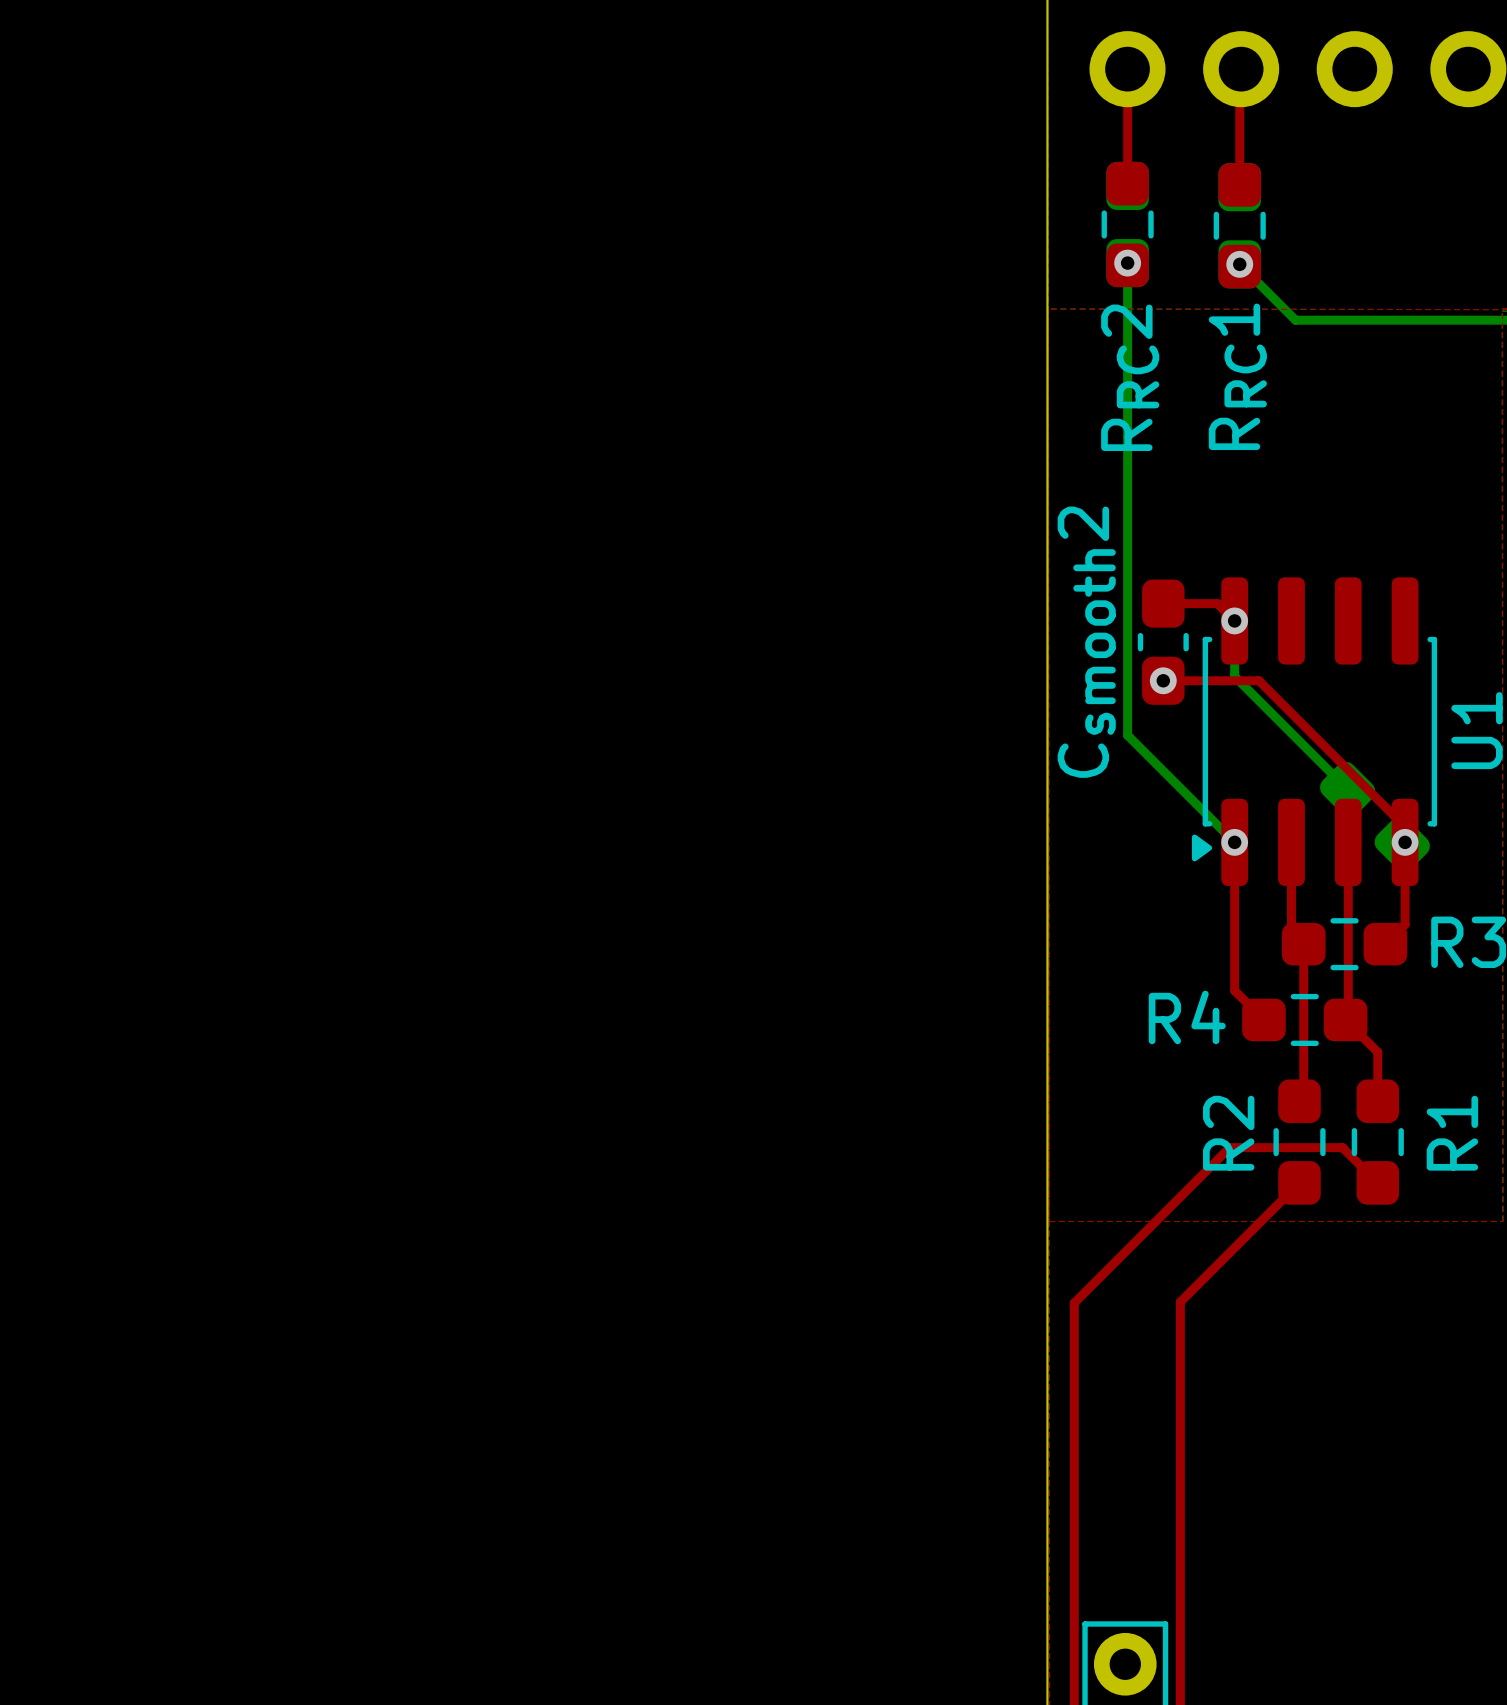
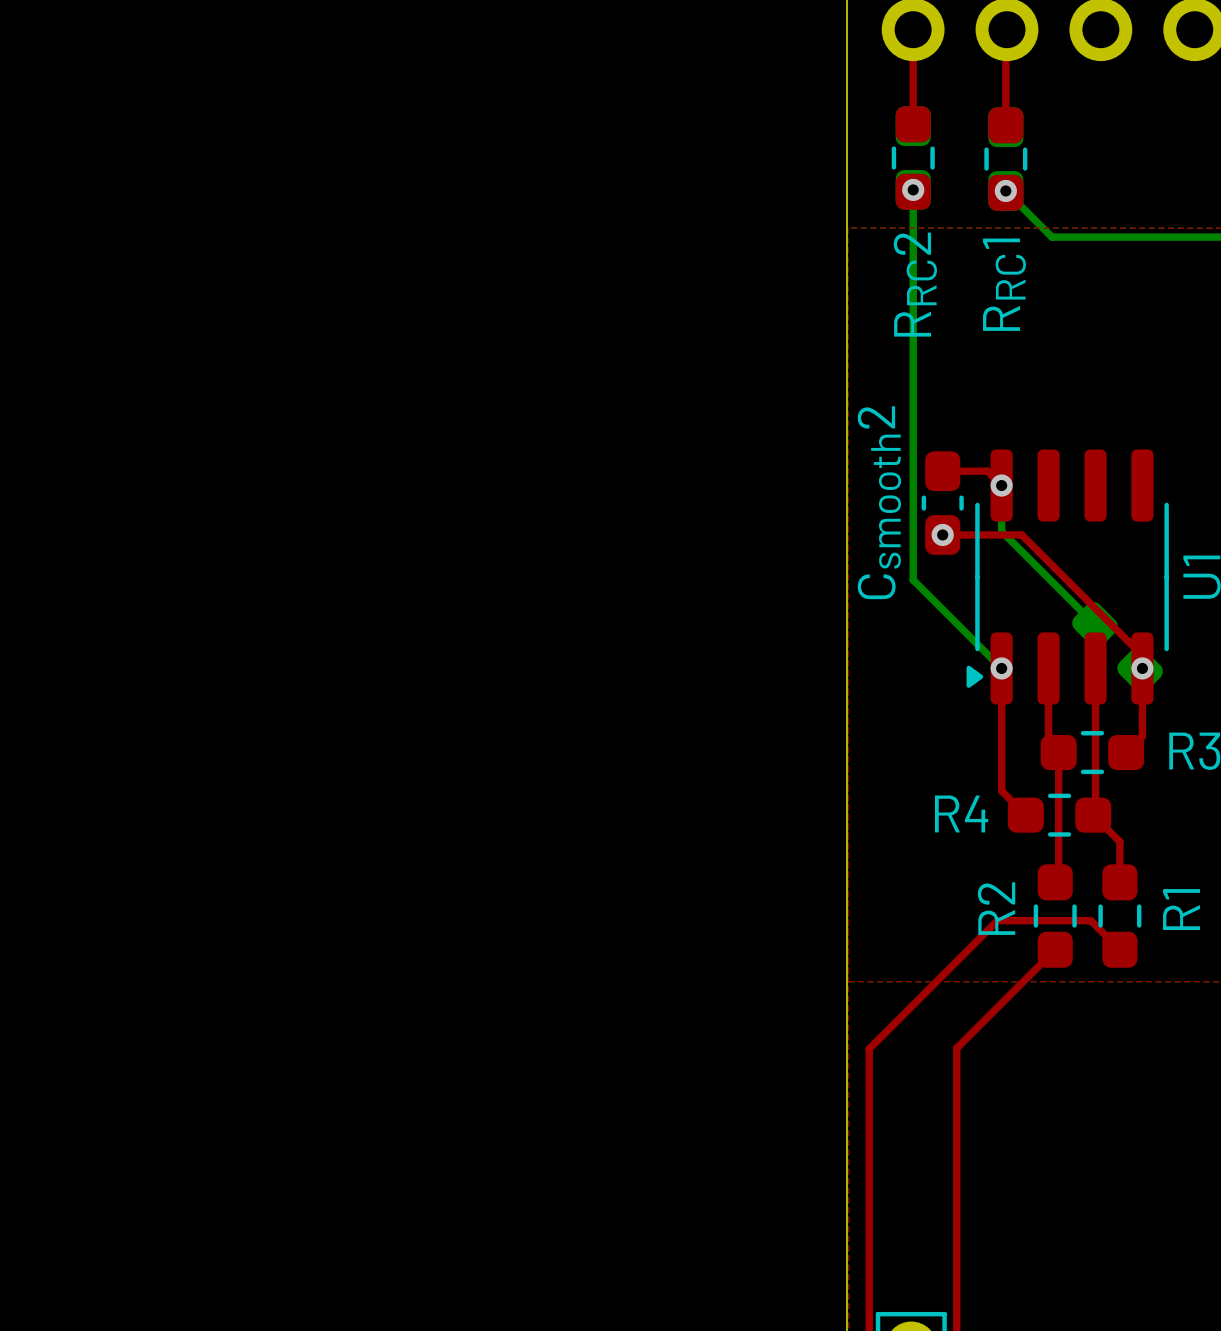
U1 footprint: [1191, 577, 1438, 886] -> [966, 449, 1169, 705]

